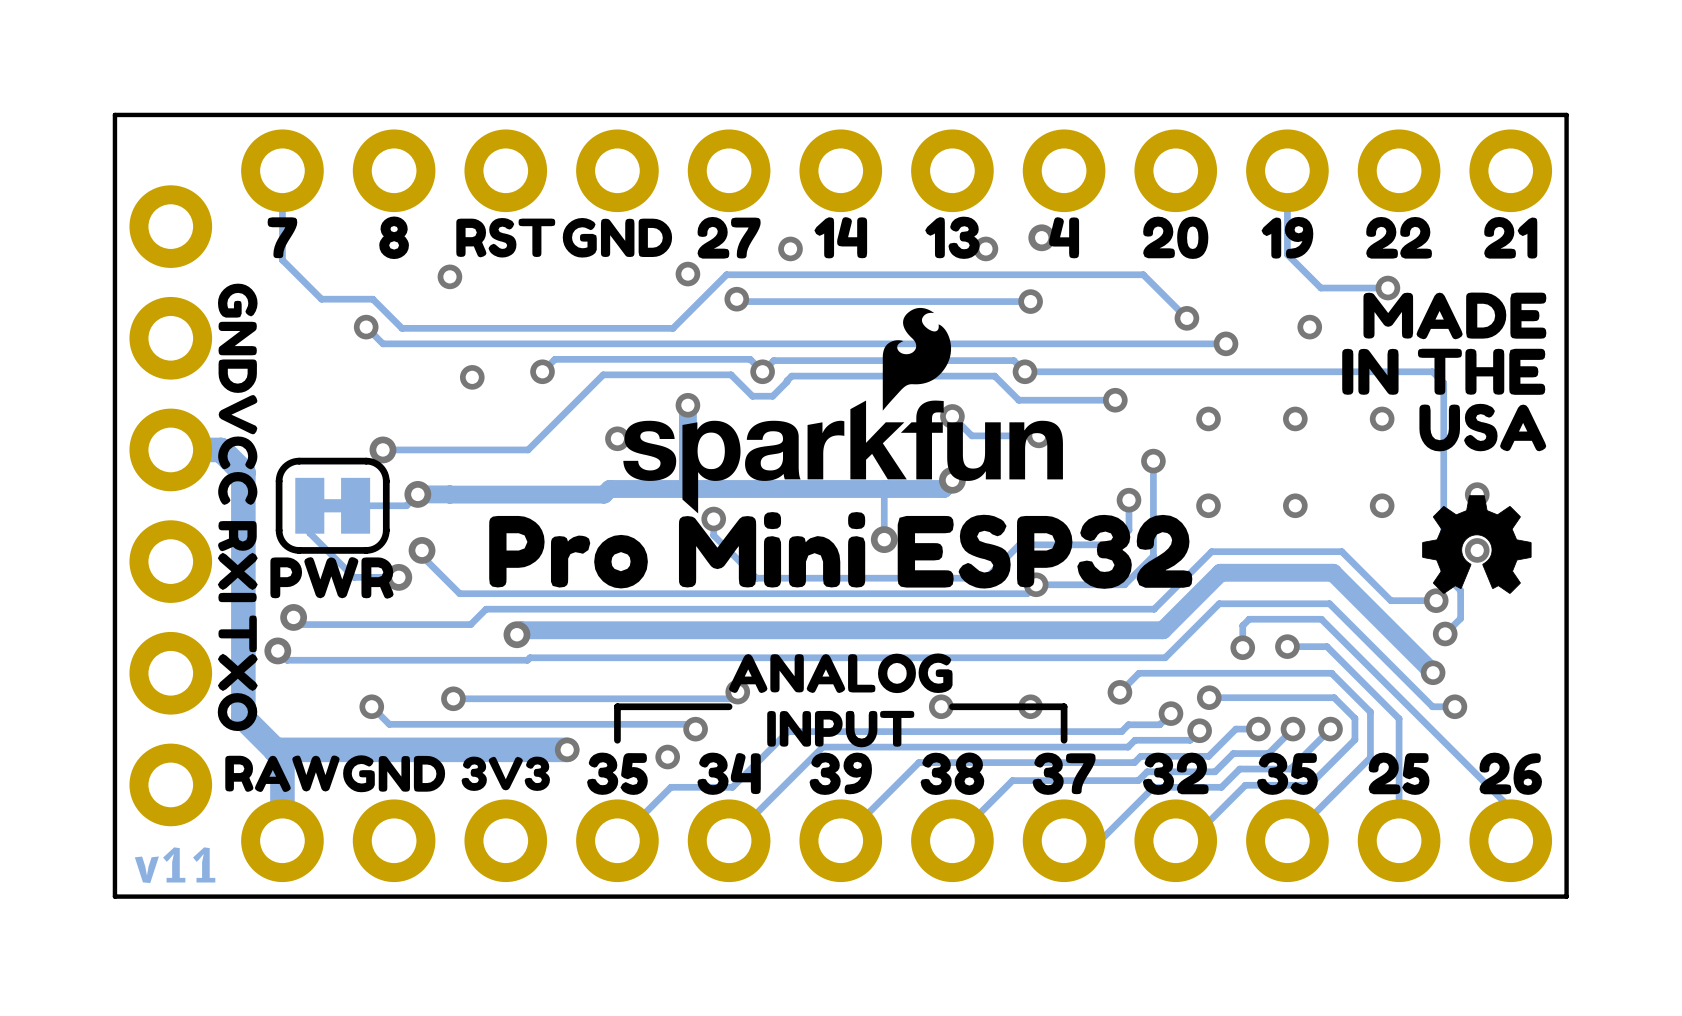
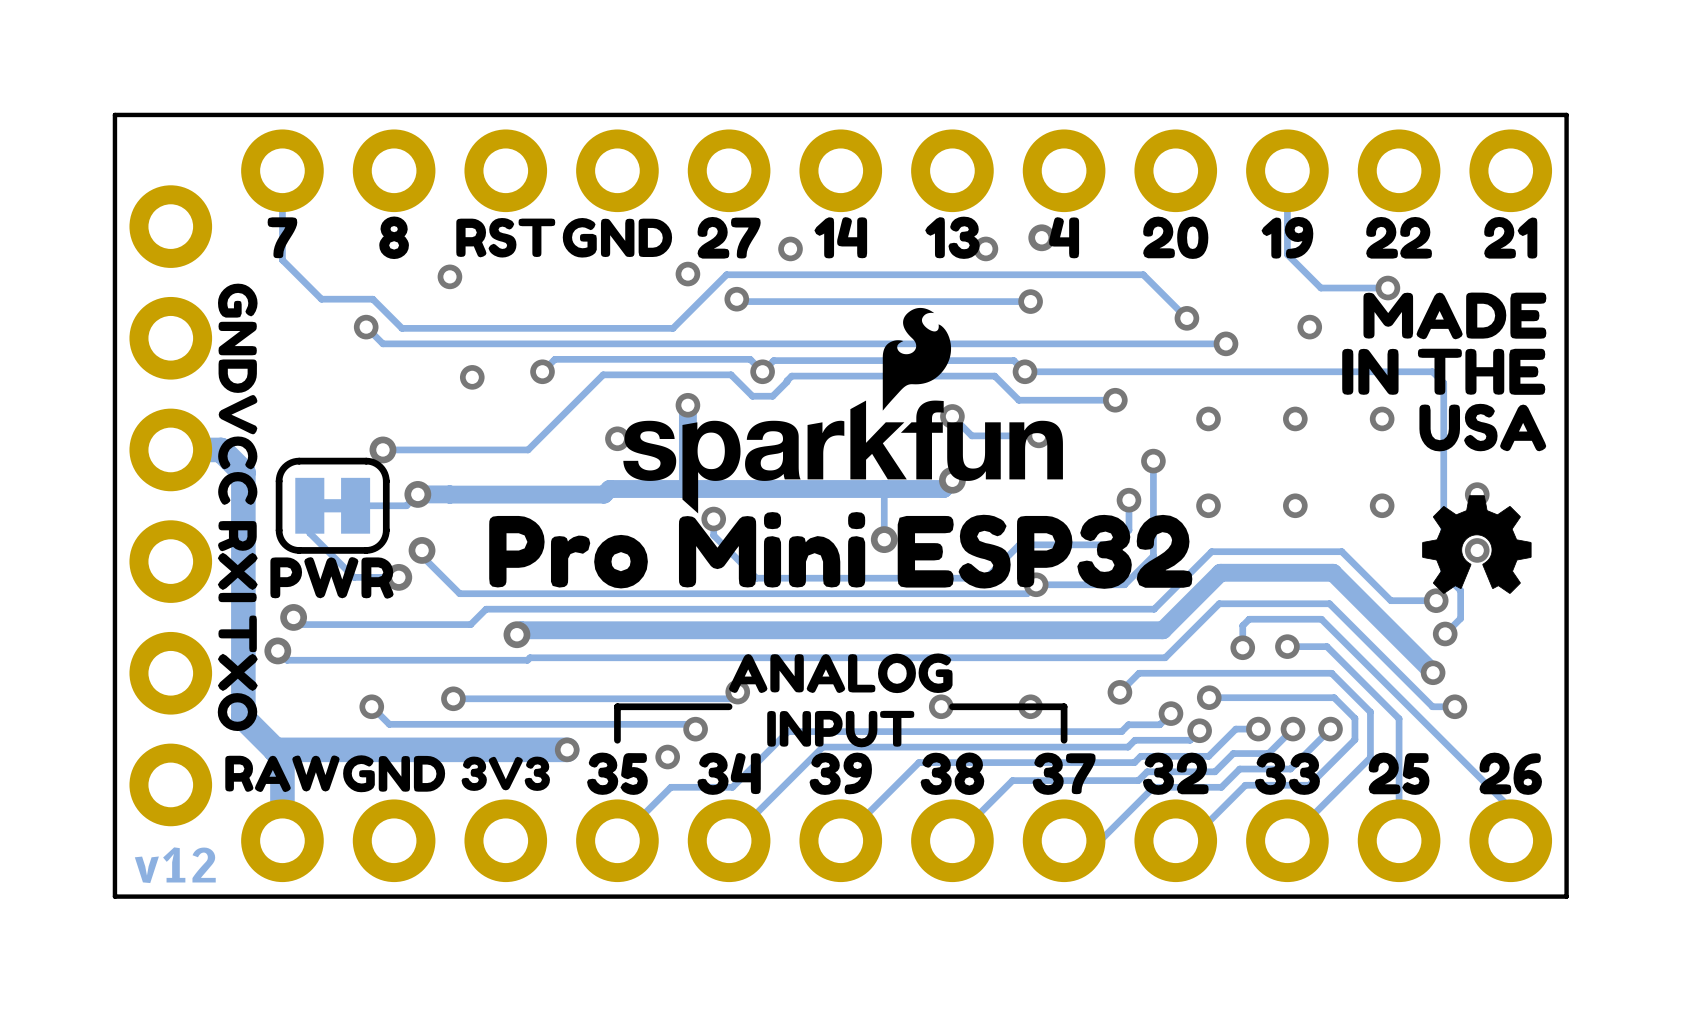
drawing shape: [1257, 752, 1318, 795] -> [1254, 752, 1320, 795]
text: v11 (175, 865) -> v12 (175, 865)

